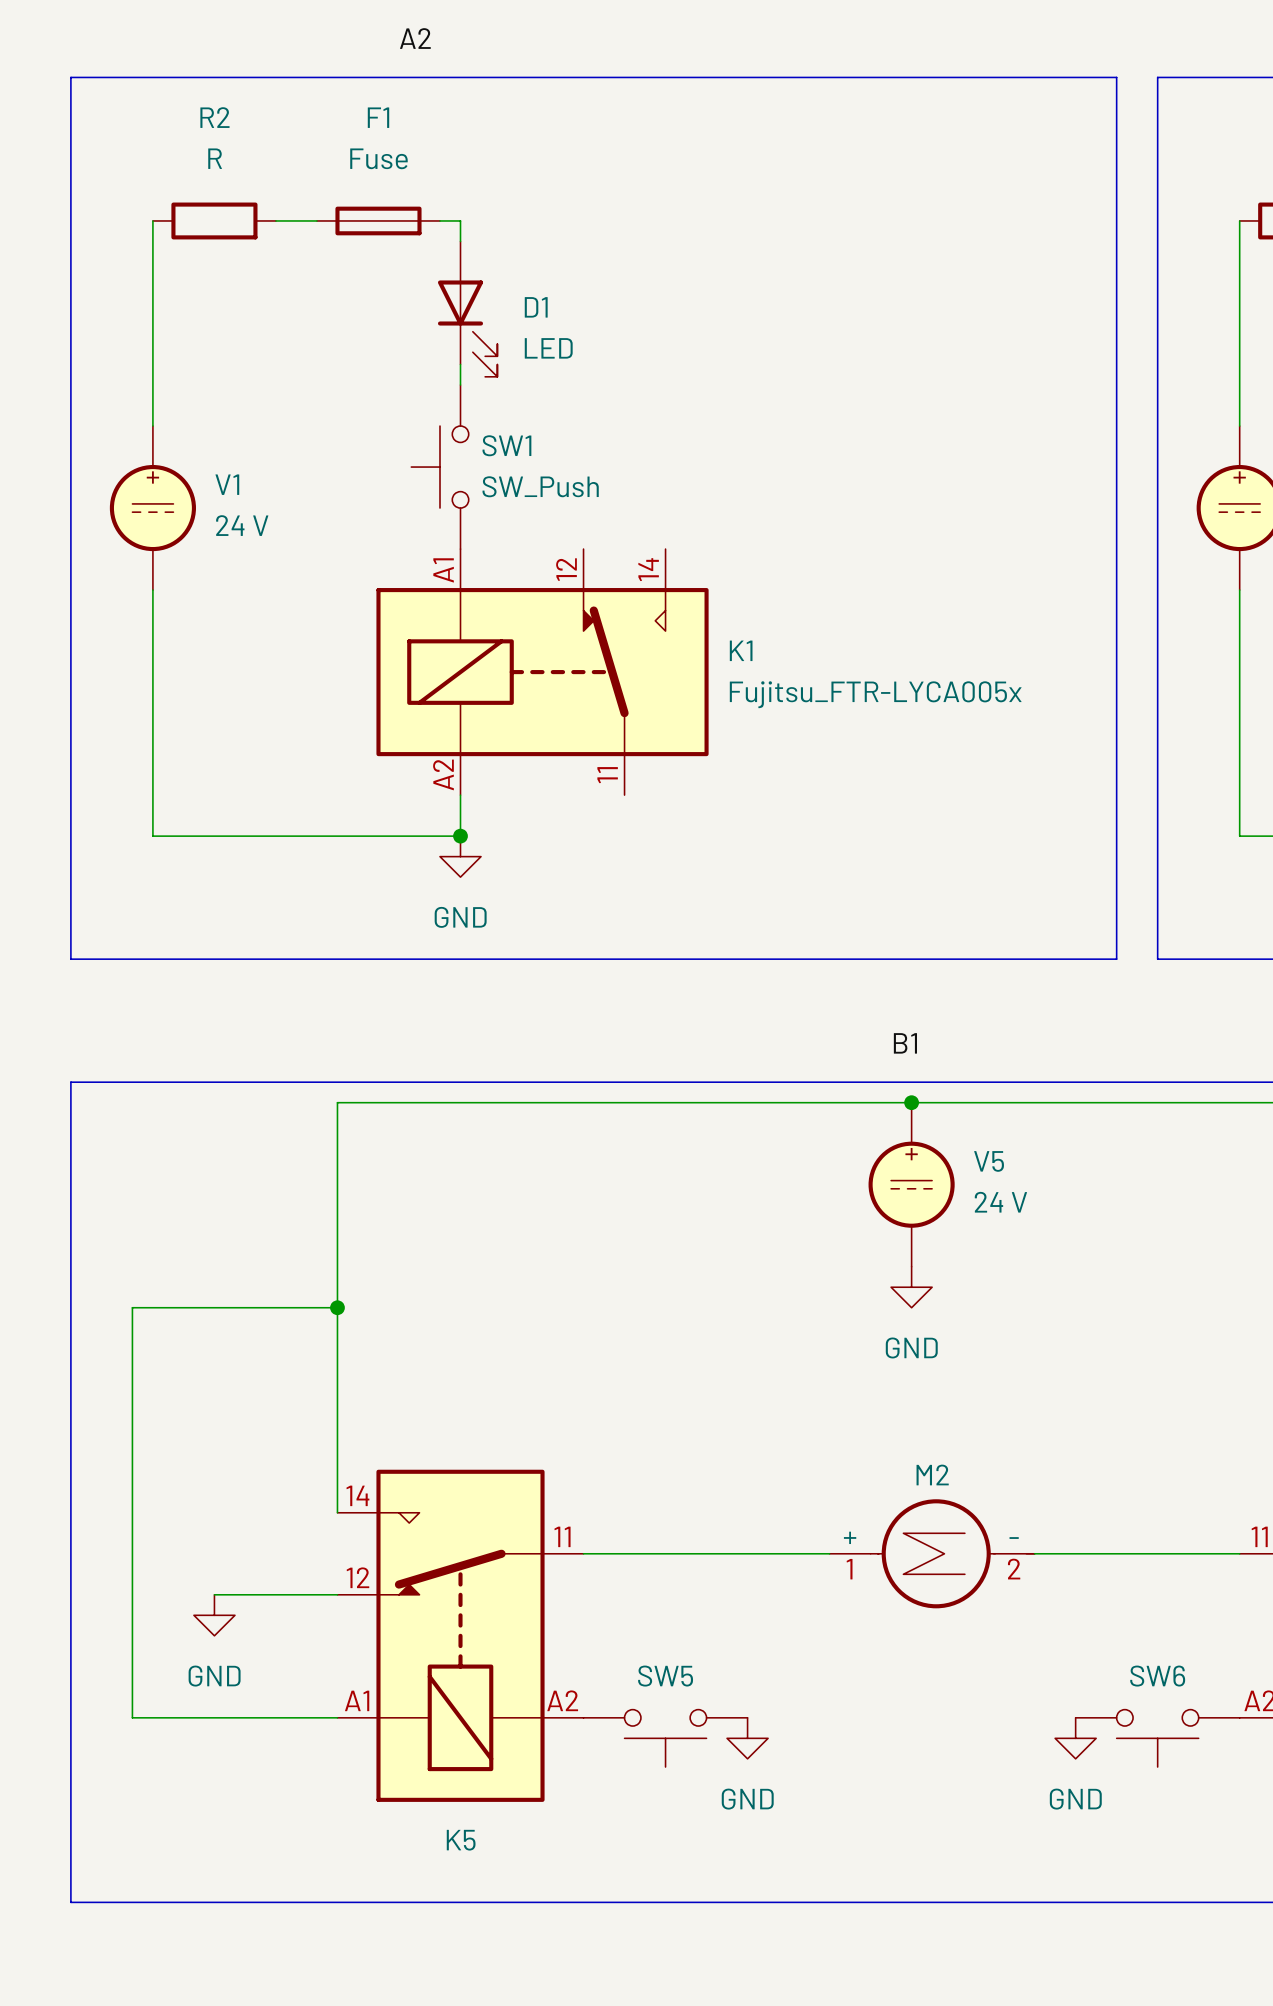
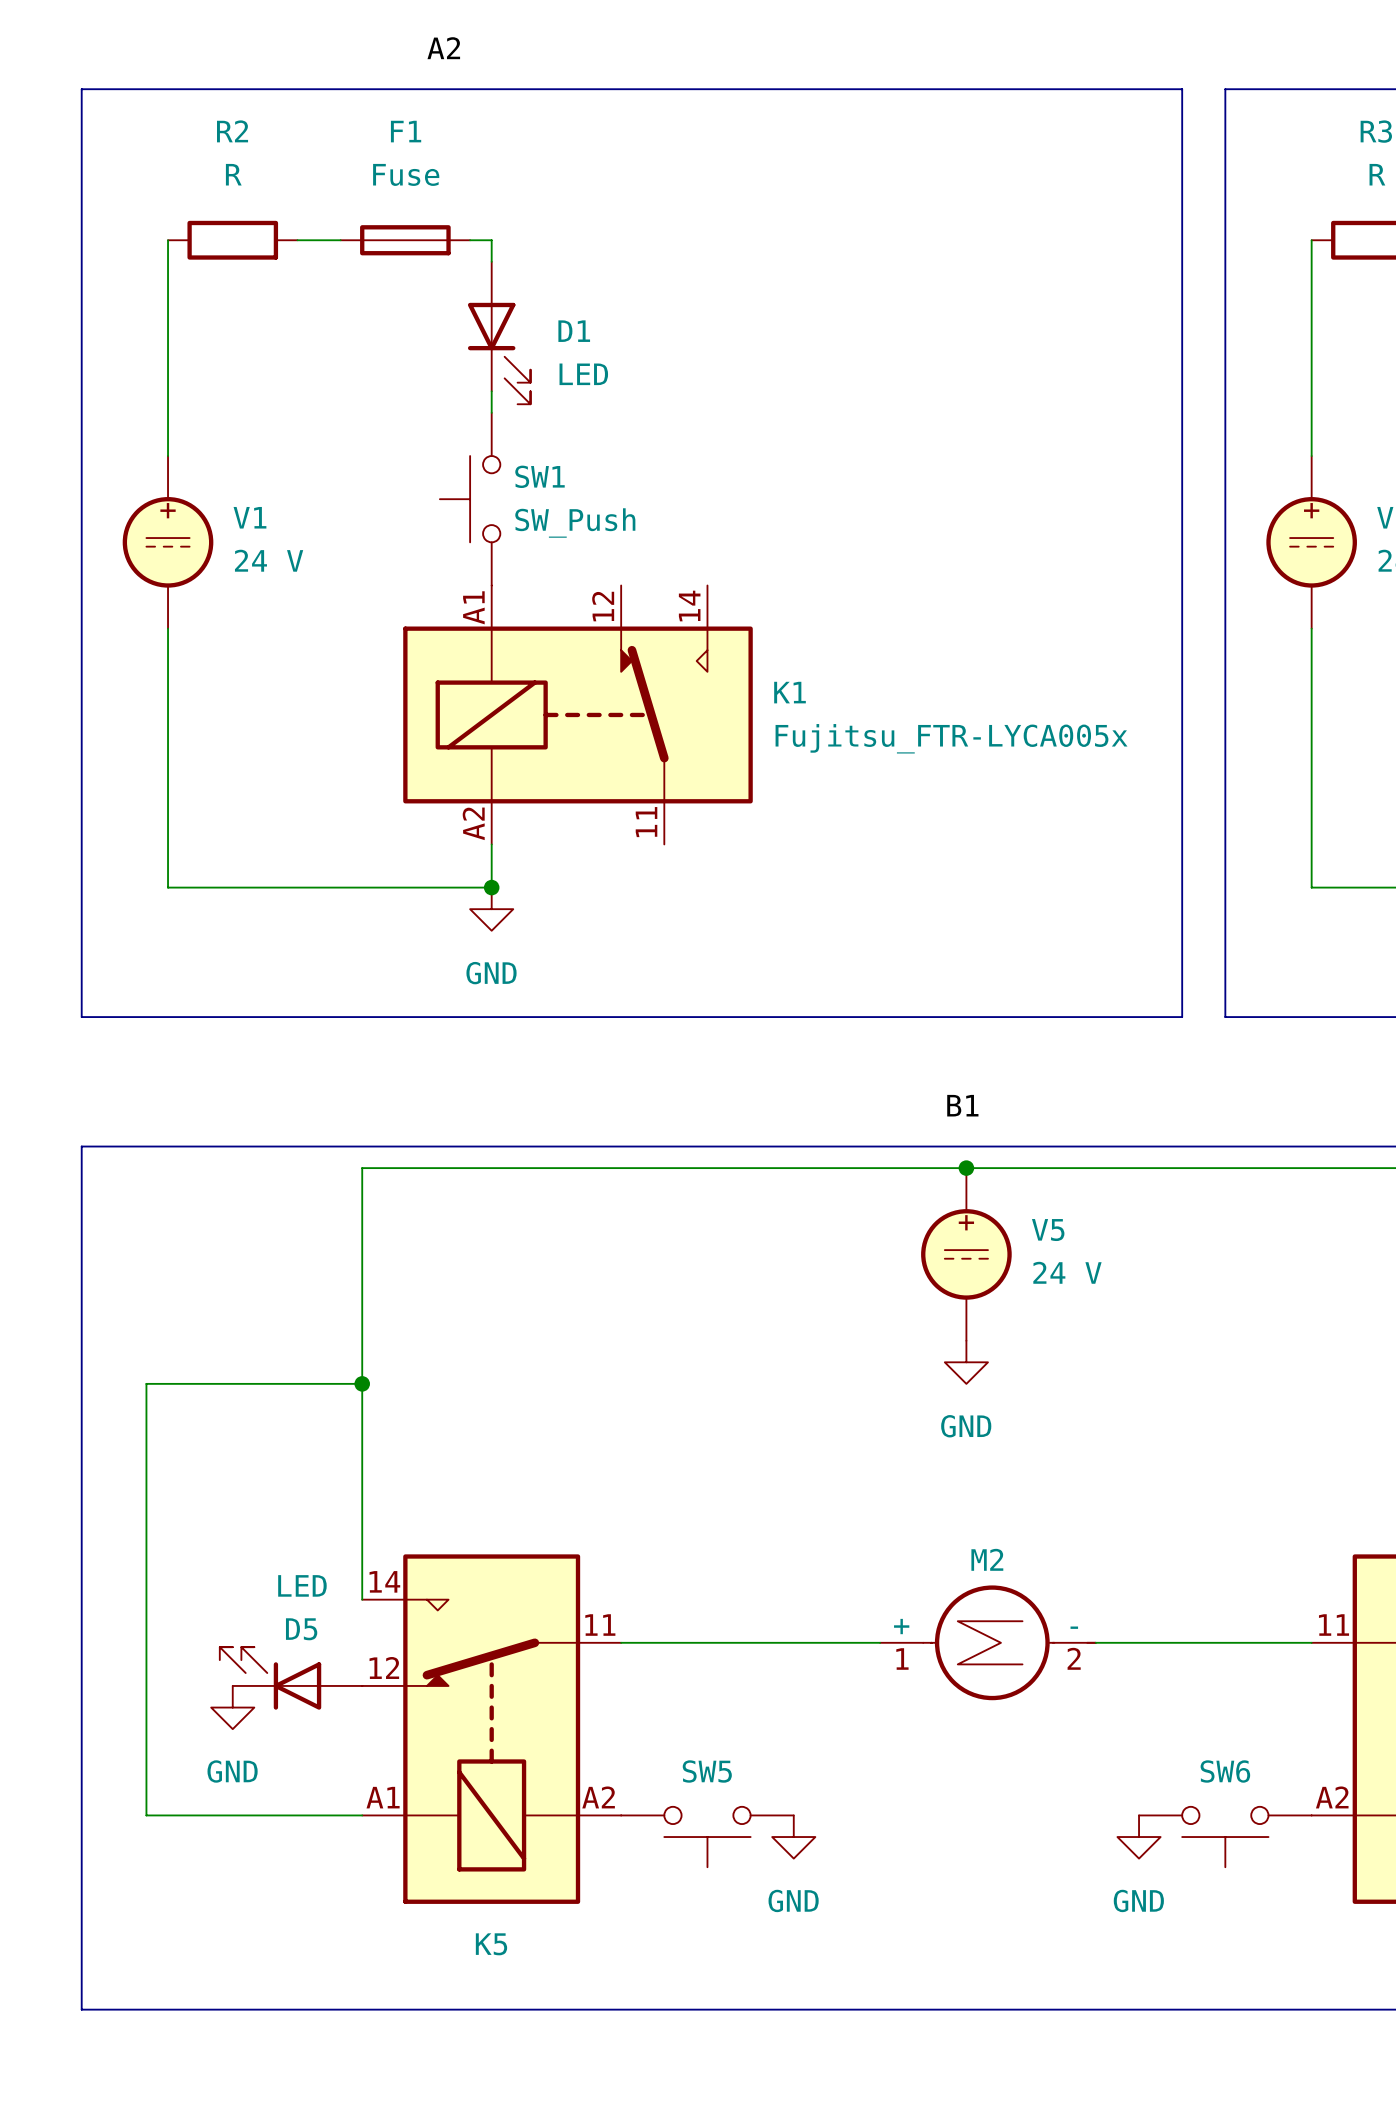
D5: none -> LED (291, 1678)

